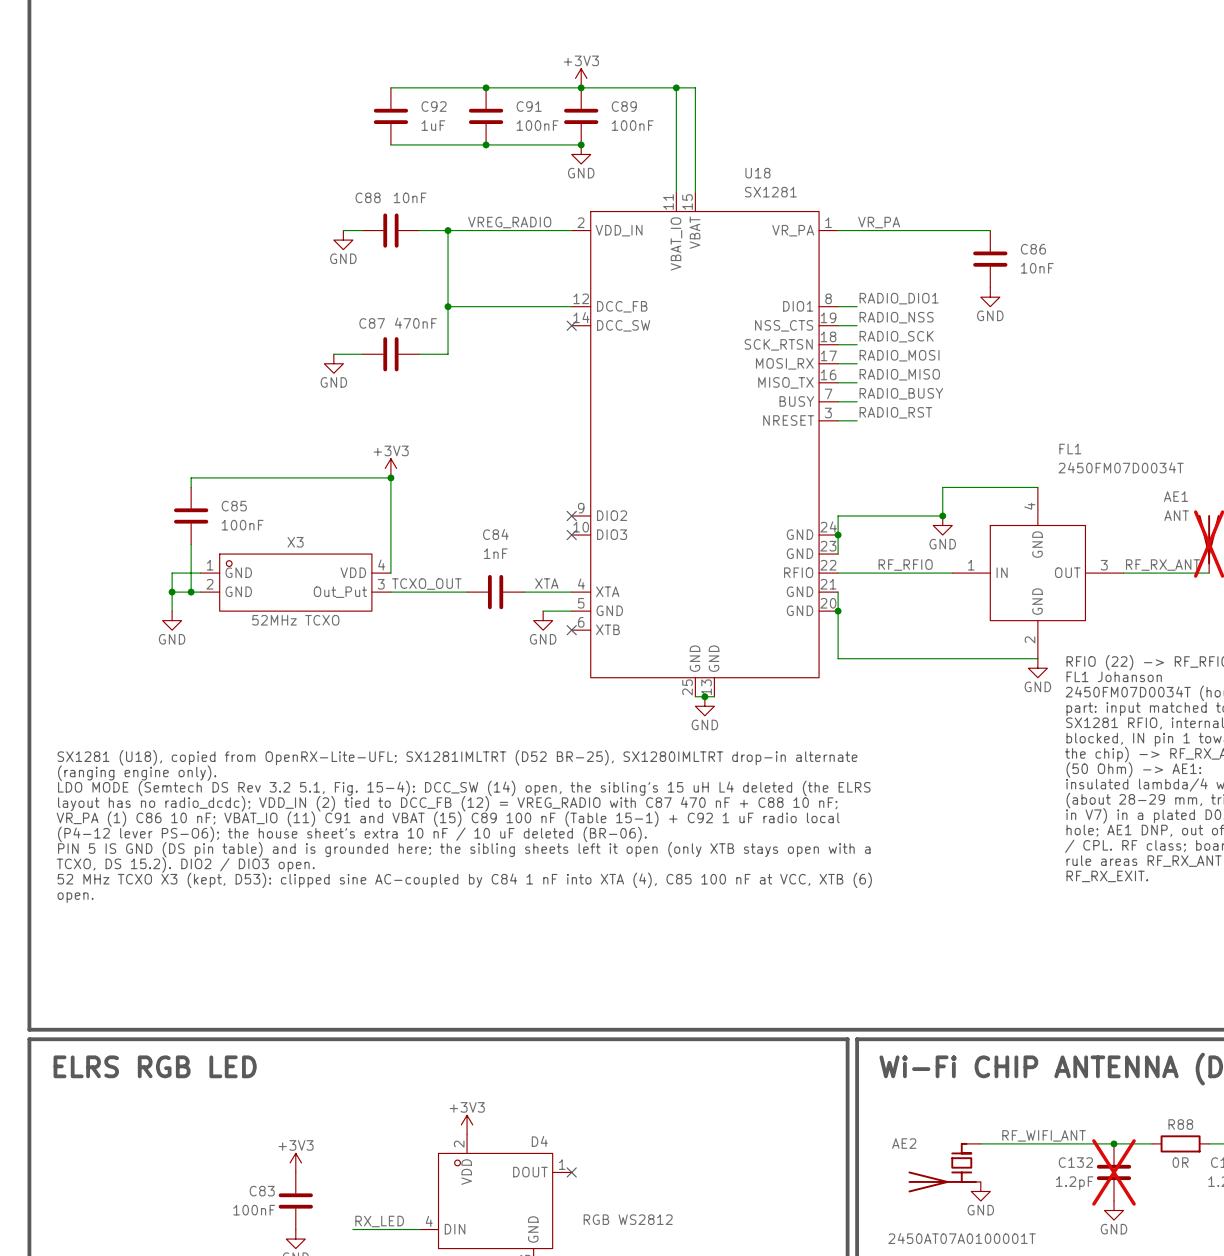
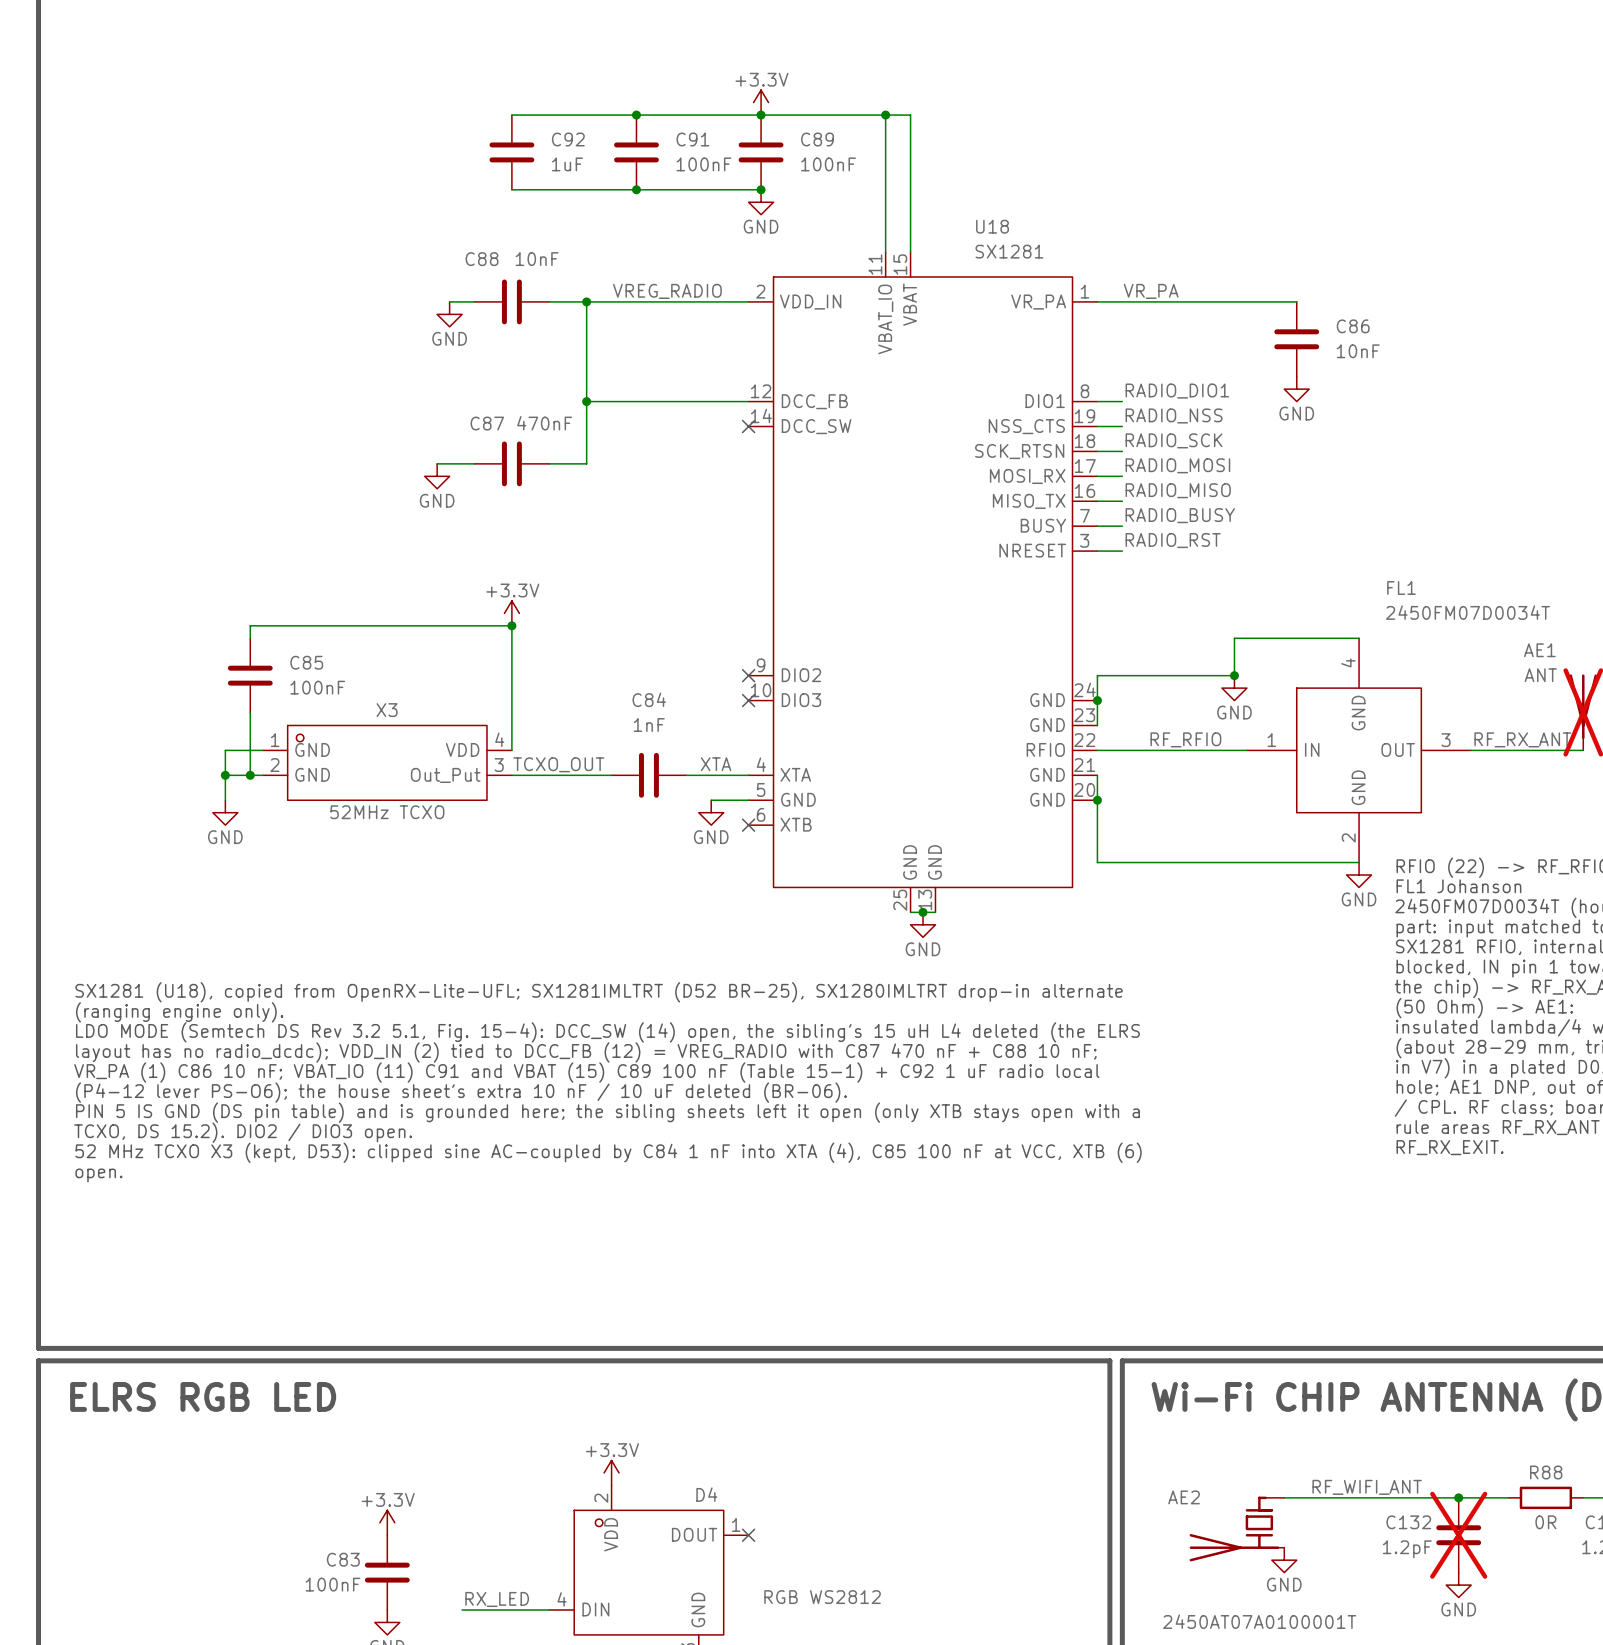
power symbol: +3V3 (581, 78) -> +3.3V (761, 102)
power symbol: +3V3 (390, 468) -> +3.3V (511, 613)
power symbol: +3V3 (467, 1124) -> +3.3V (611, 1472)
power symbol: +3V3 (295, 1162) -> +3.3V (387, 1522)

